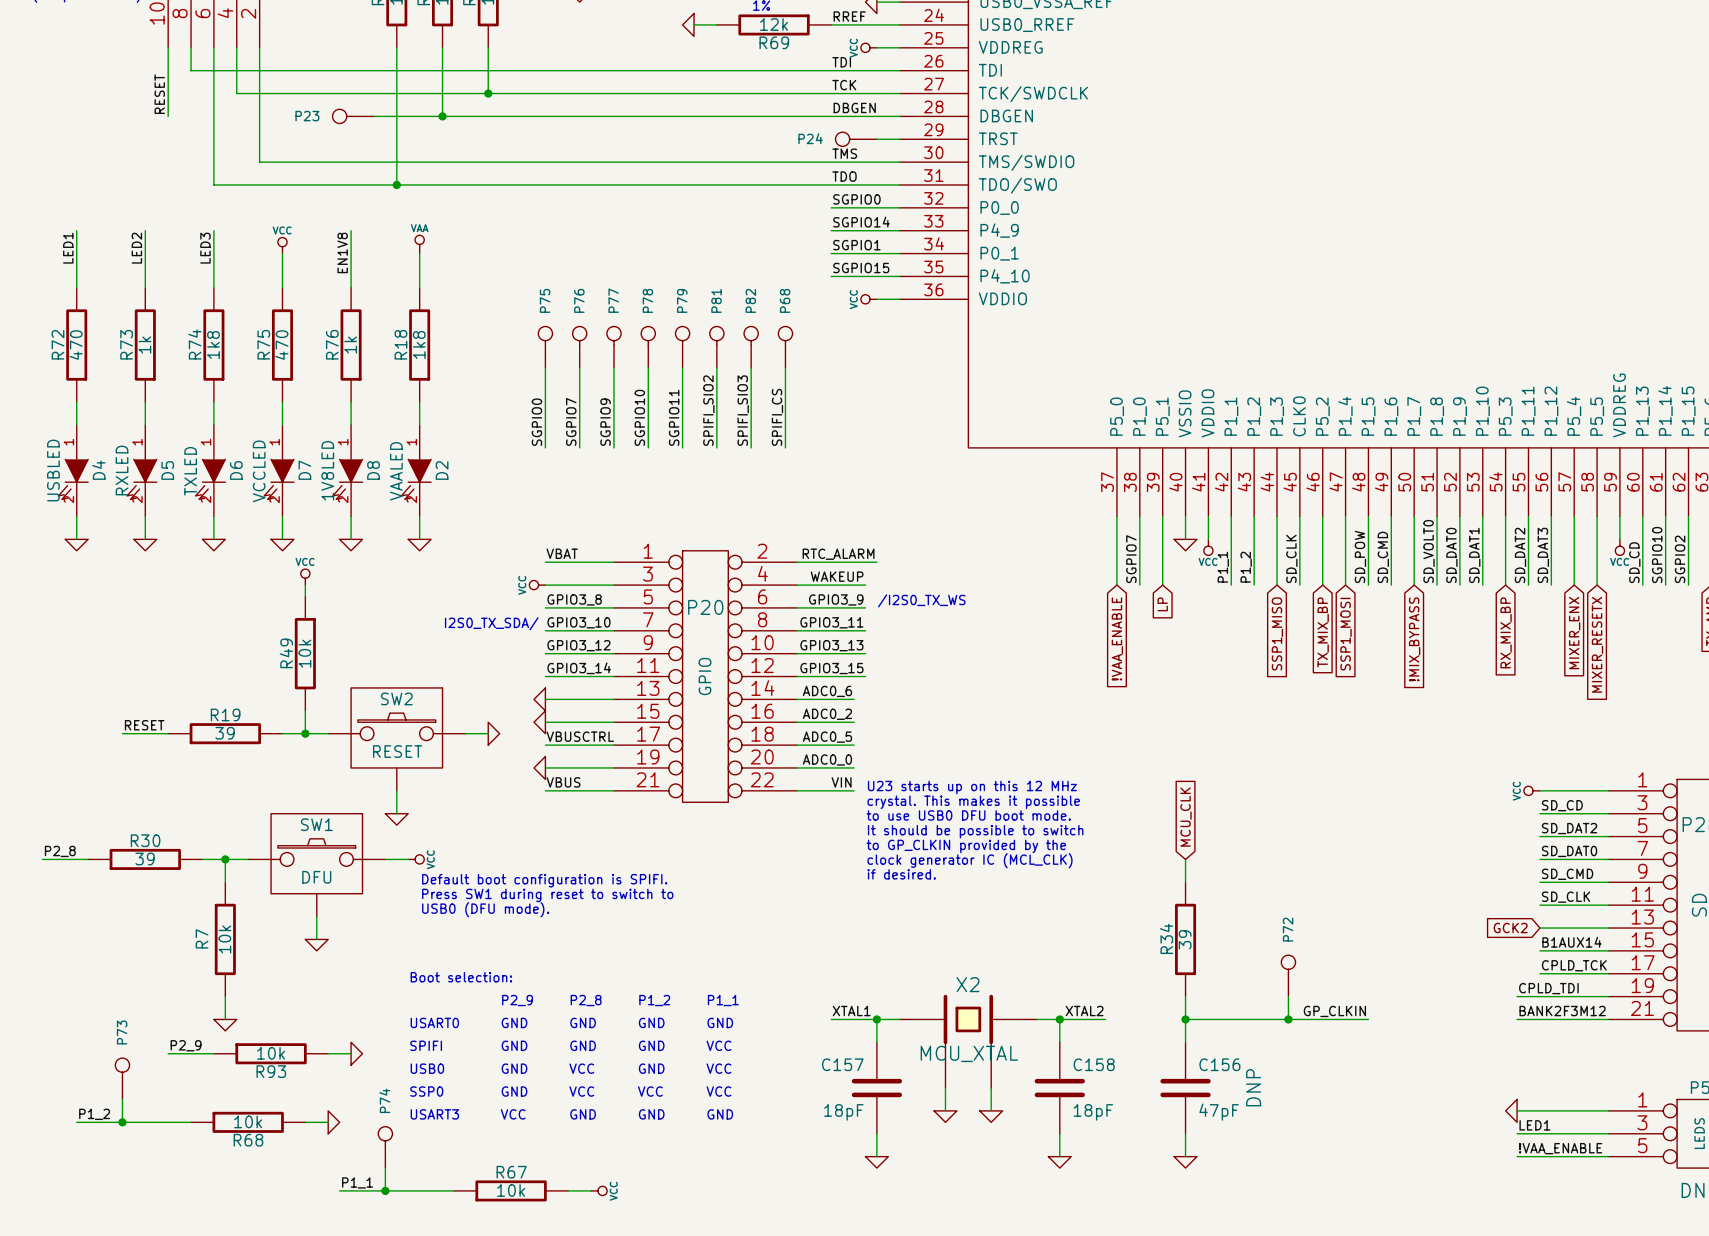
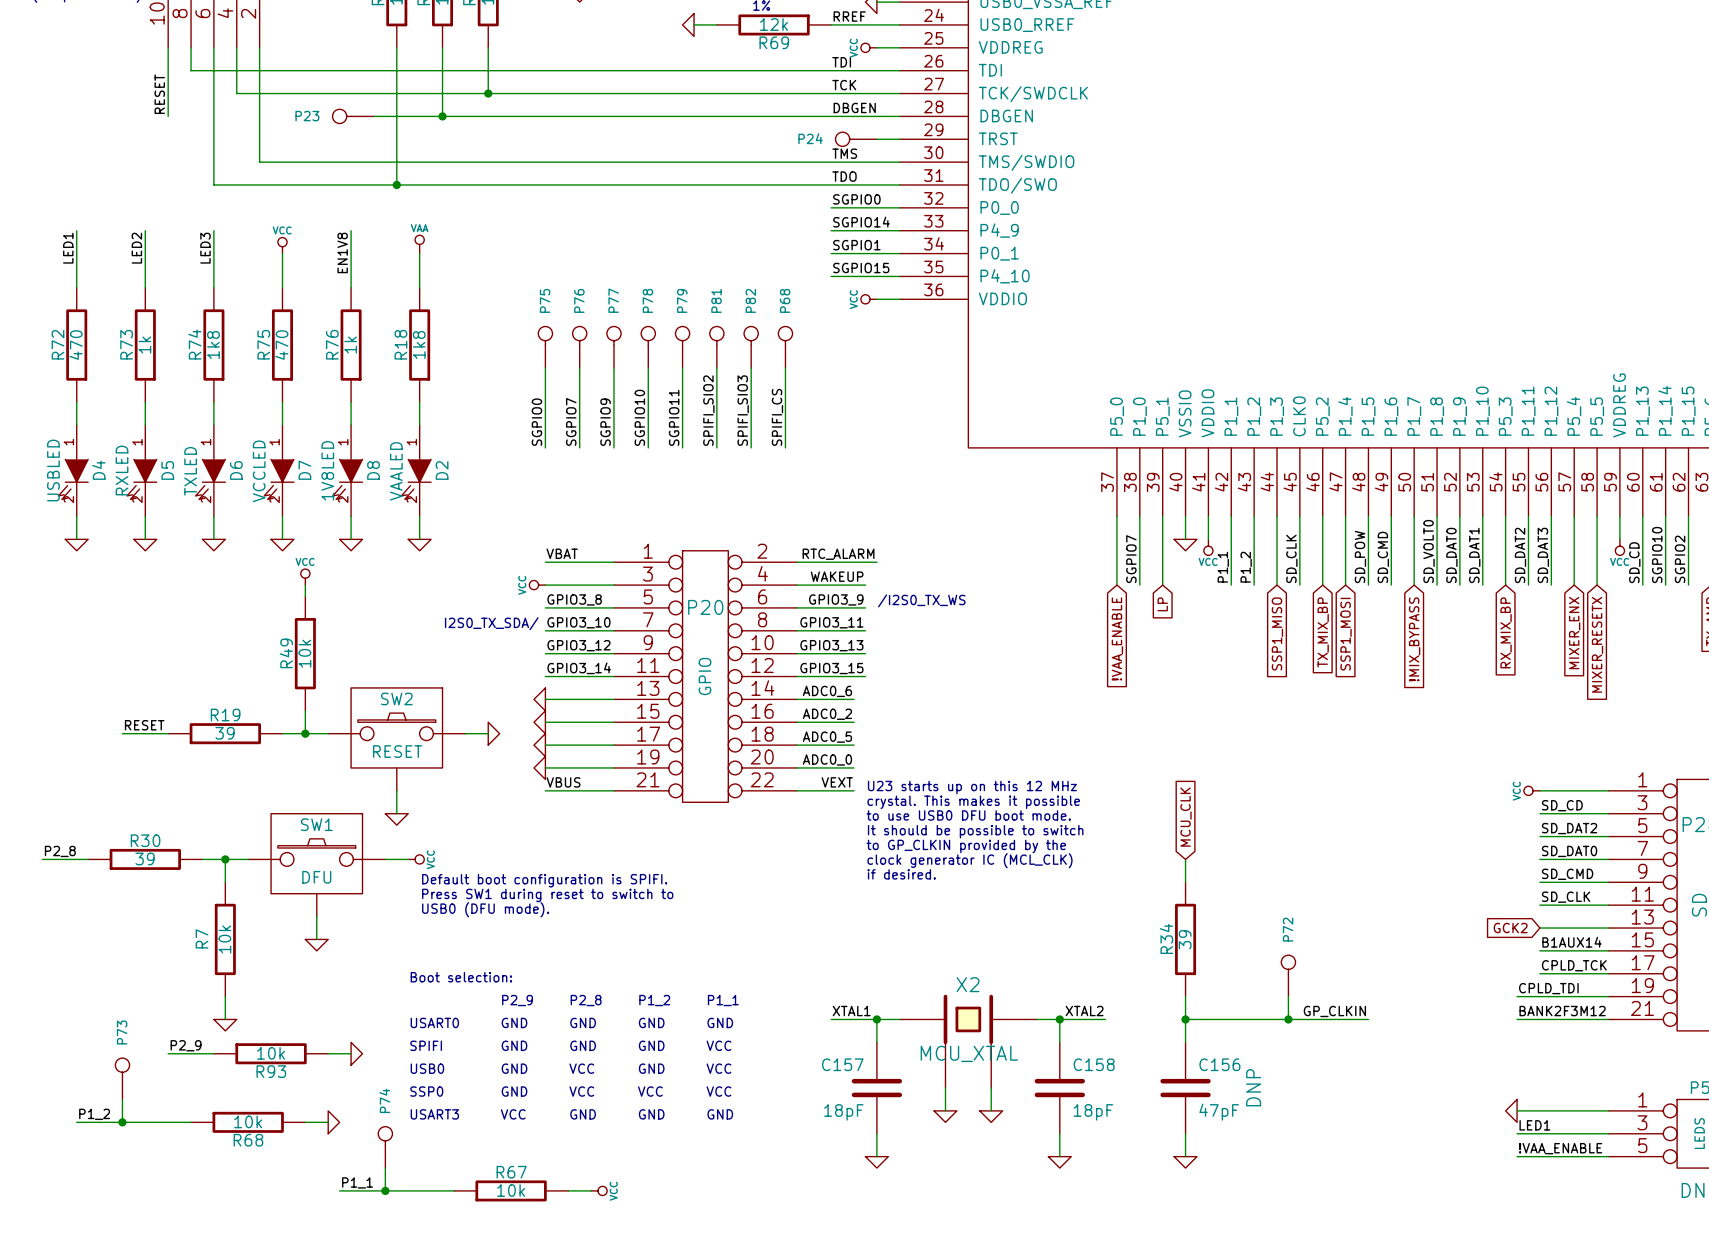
label: VBUSCTRL (580, 736) -> none
power symbol: none -> (539, 745)
label: VIN (841, 782) -> VEXT (837, 782)

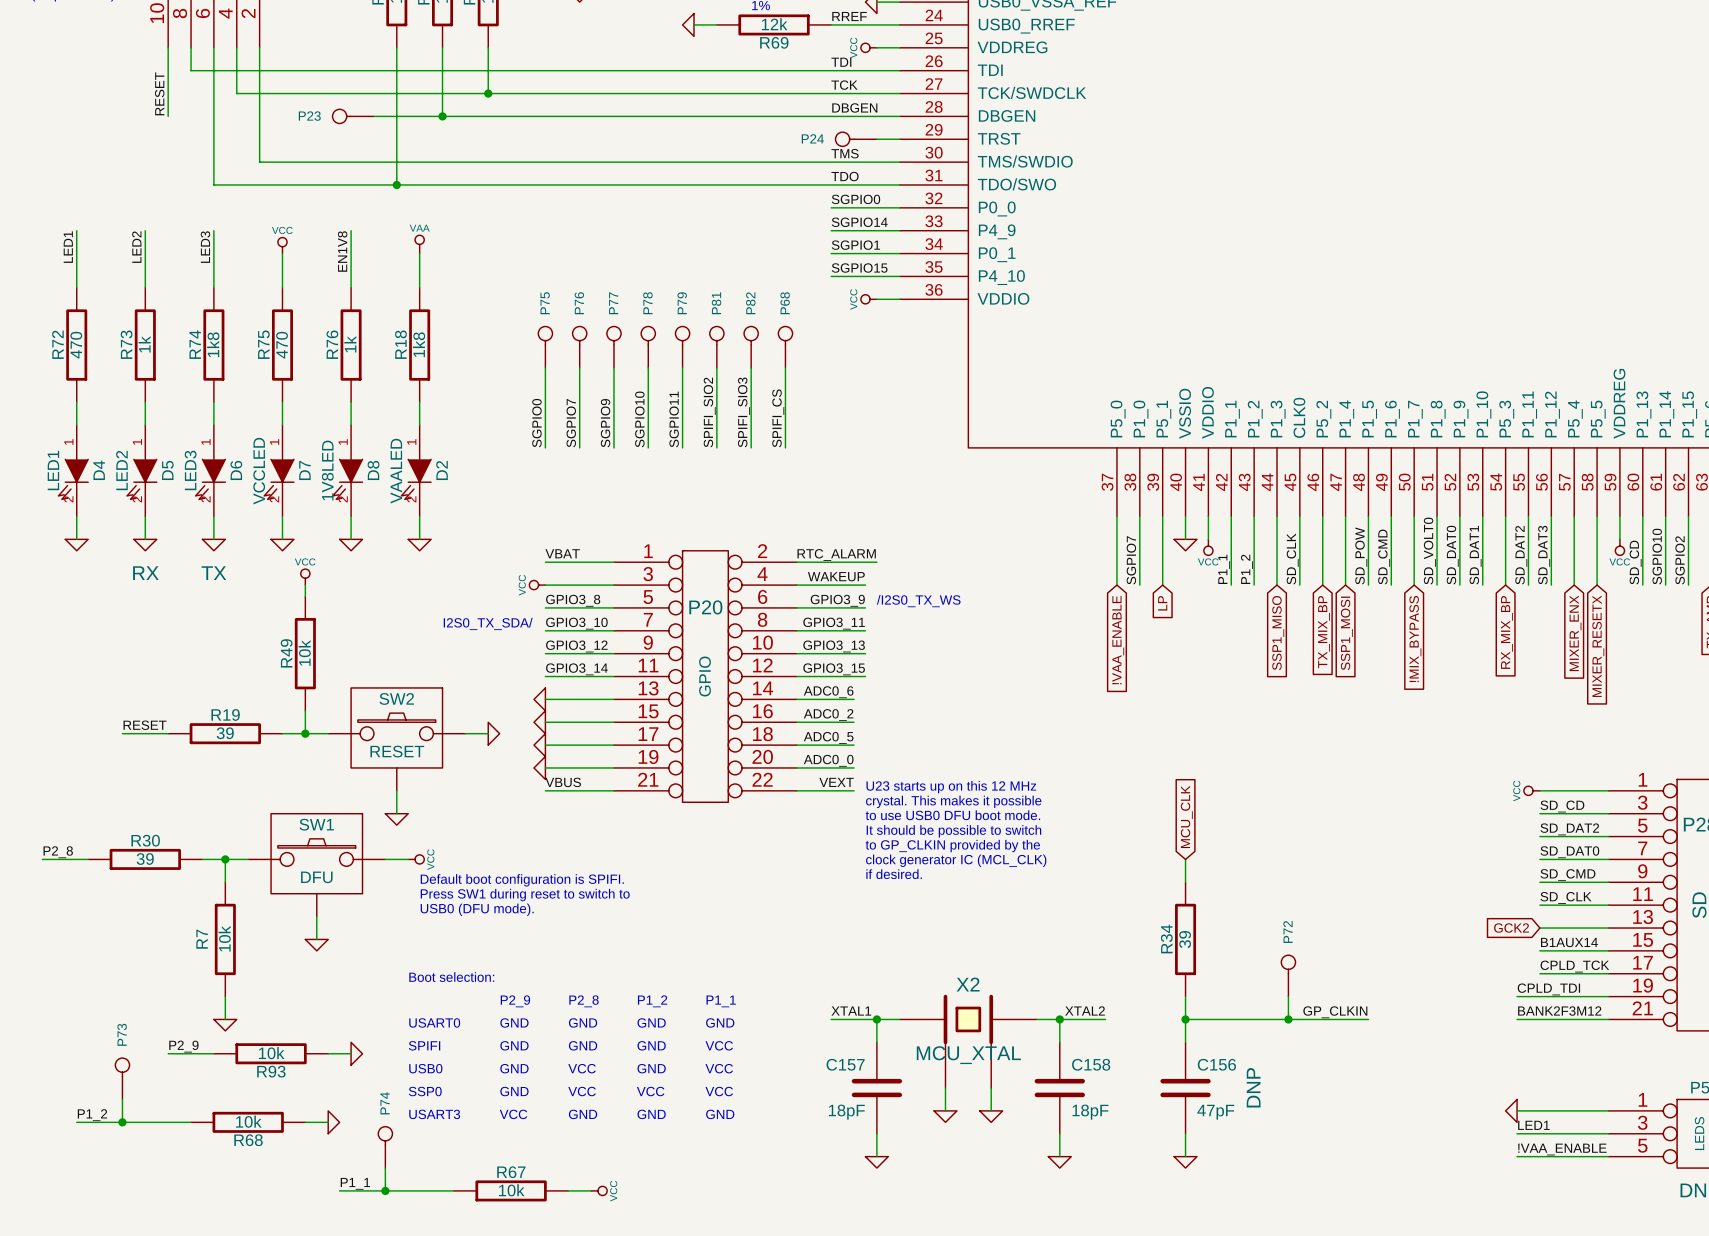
D4 value: USBLED (53, 470) -> LED1 (53, 470)
D5 value: RXLED (122, 470) -> LED2 (121, 470)
D6 value: TXLED (190, 471) -> LED3 (190, 470)
D5 text: none -> RX (145, 573)
D6 text: none -> TX (213, 573)

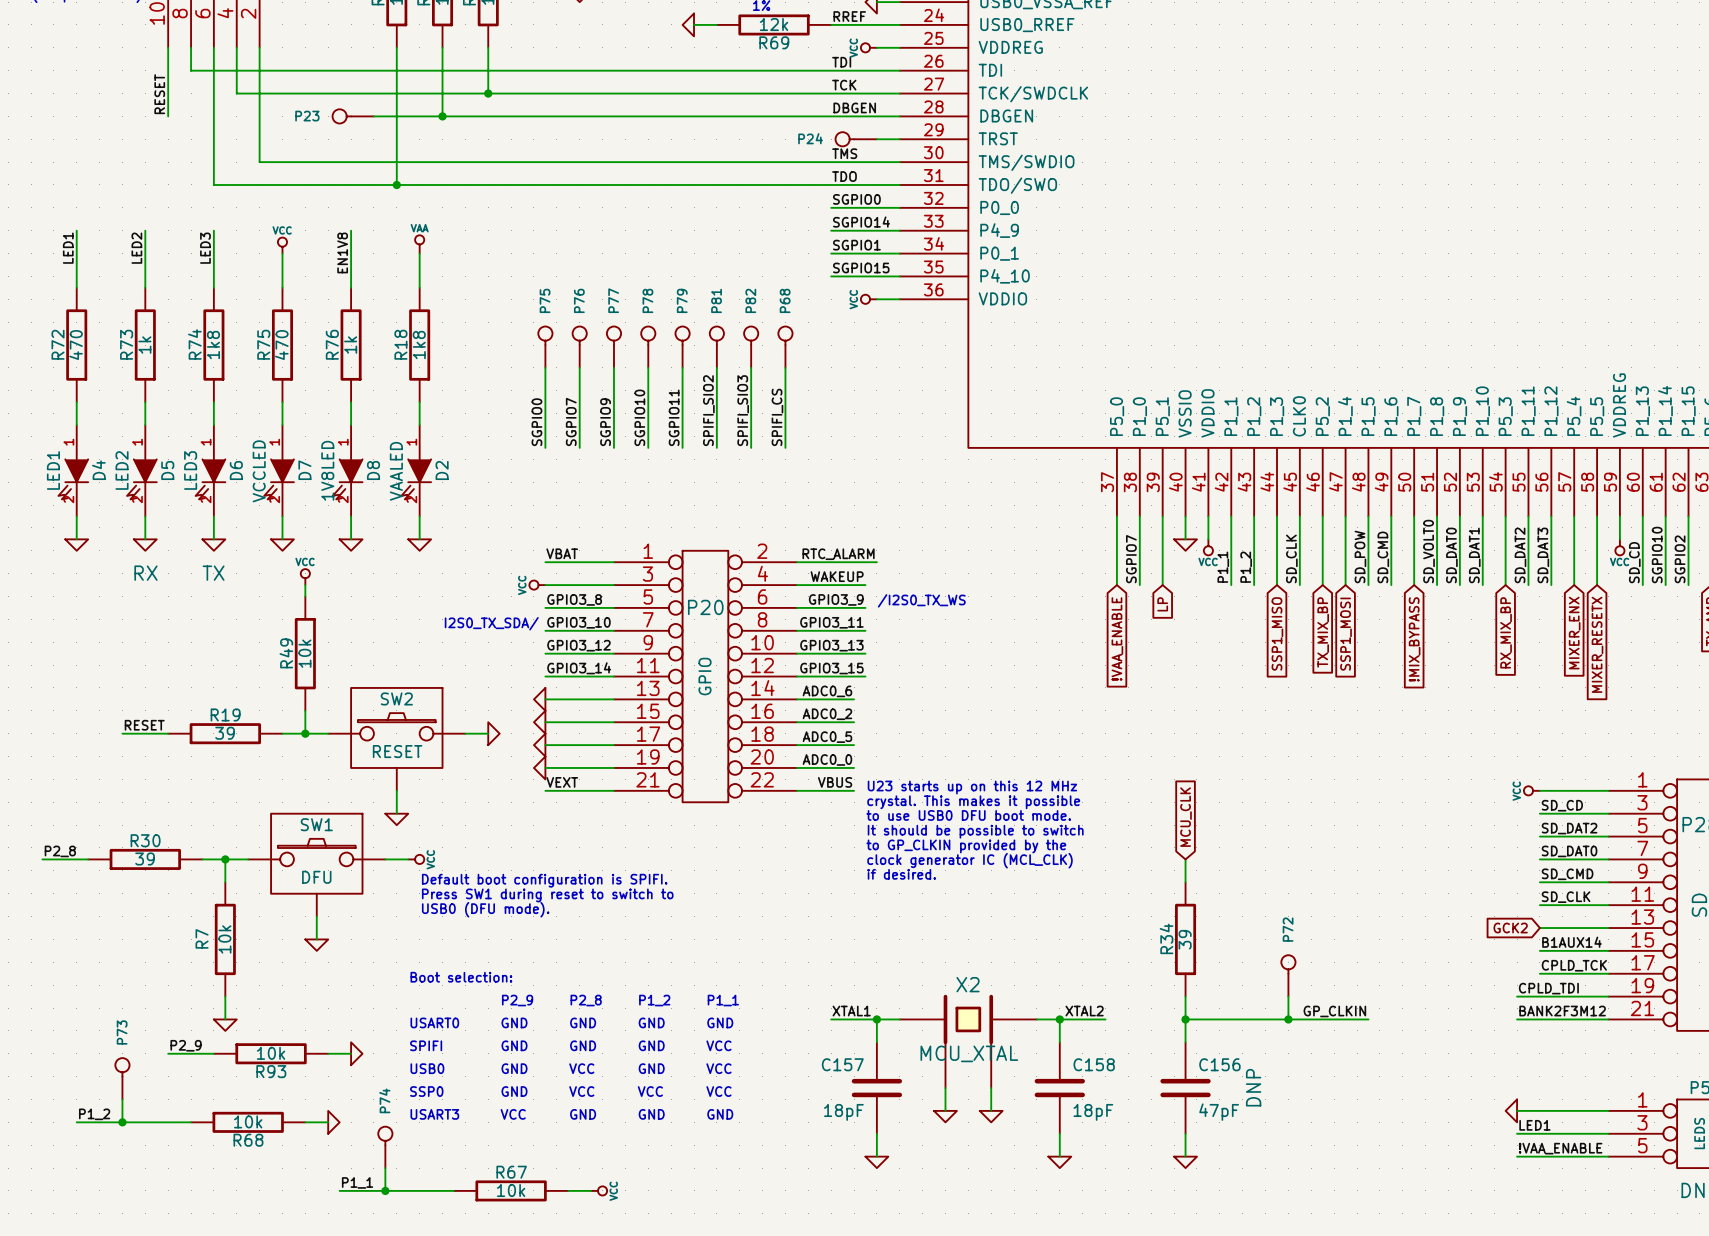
label: VBUS (563, 782) -> VEXT (562, 782)
label: VEXT (836, 782) -> VBUS (835, 782)

